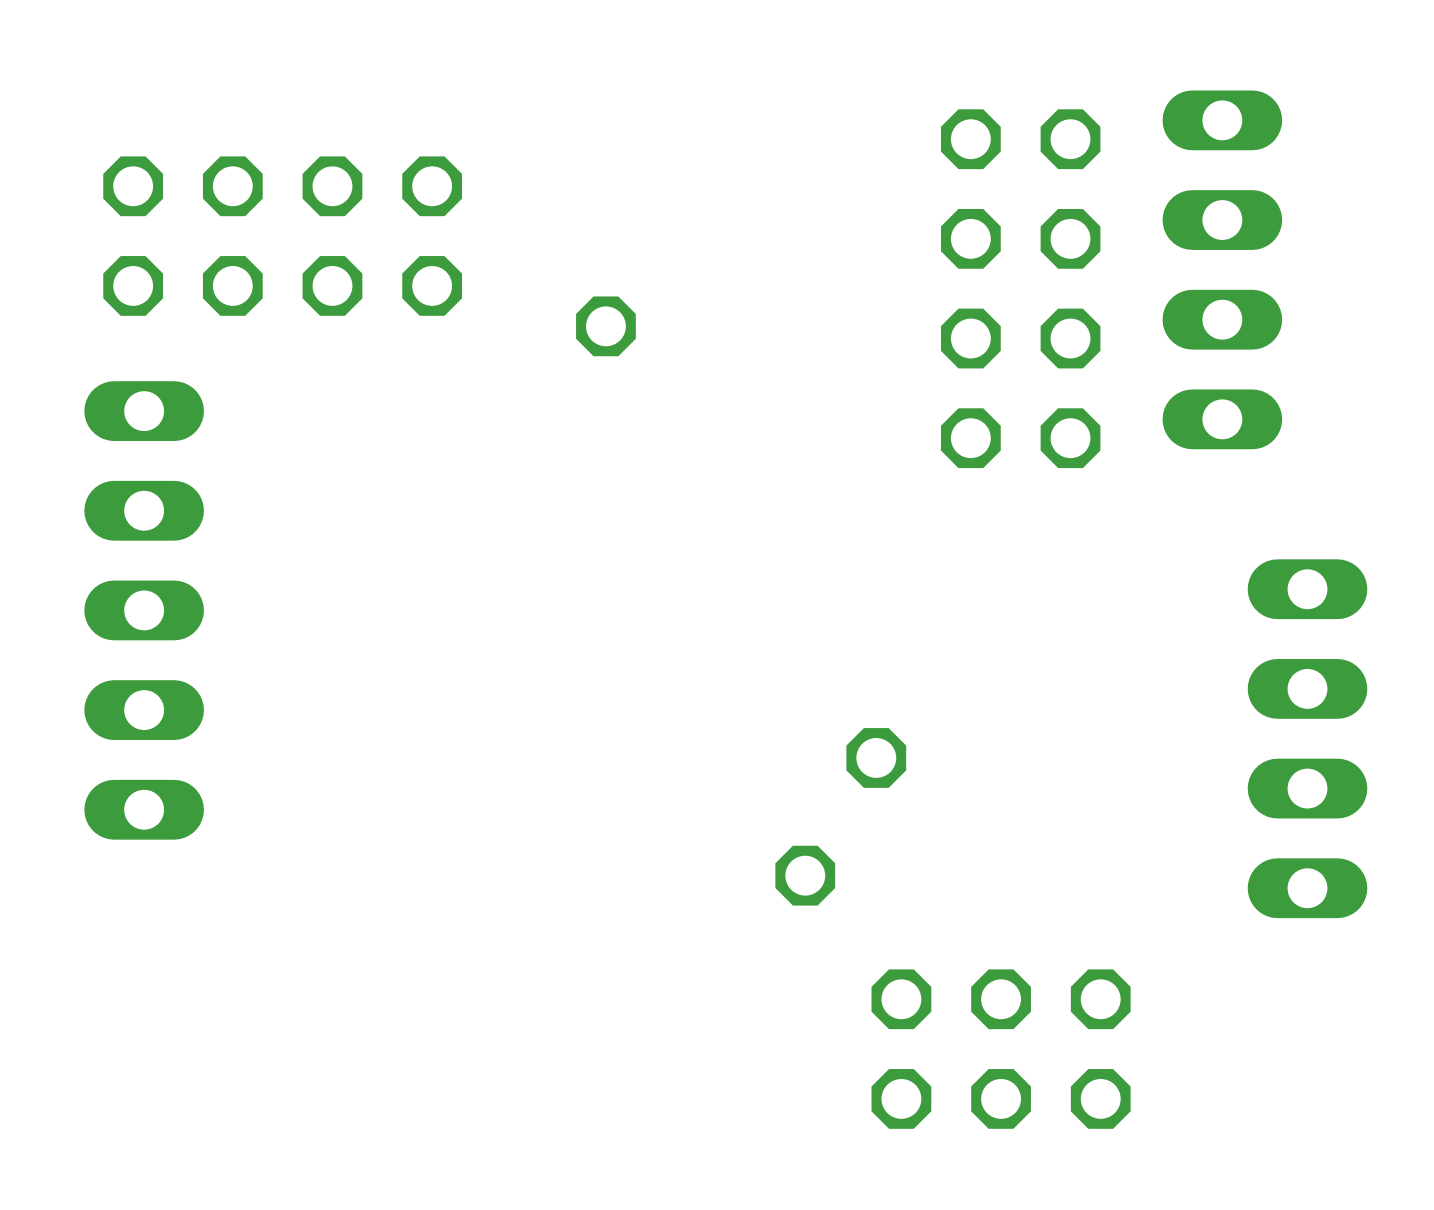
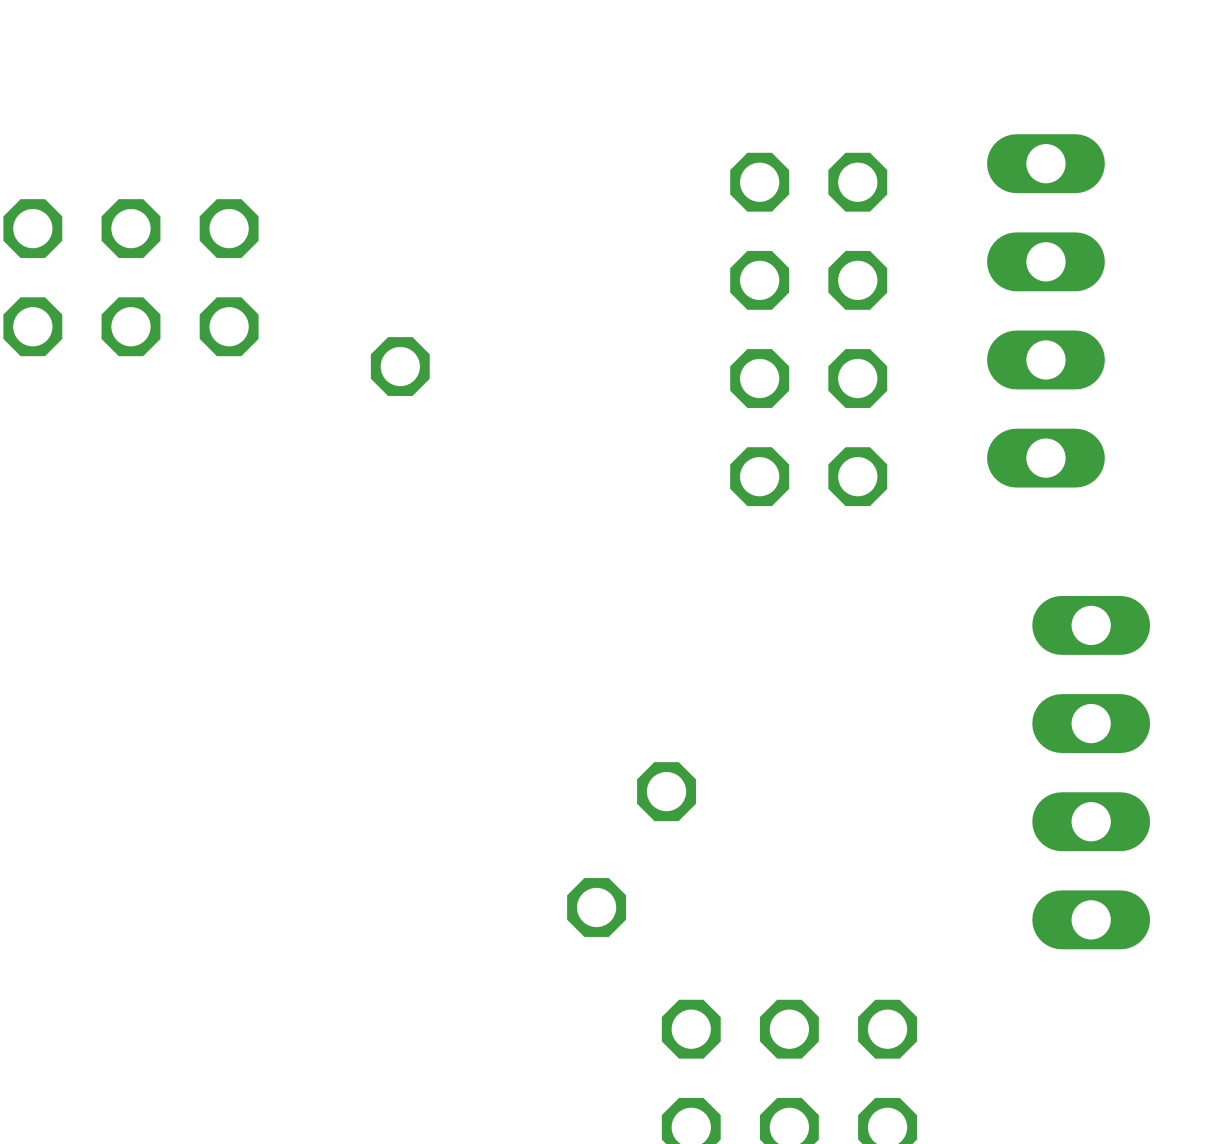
part position: (1222, 269) -> (1045, 310)

